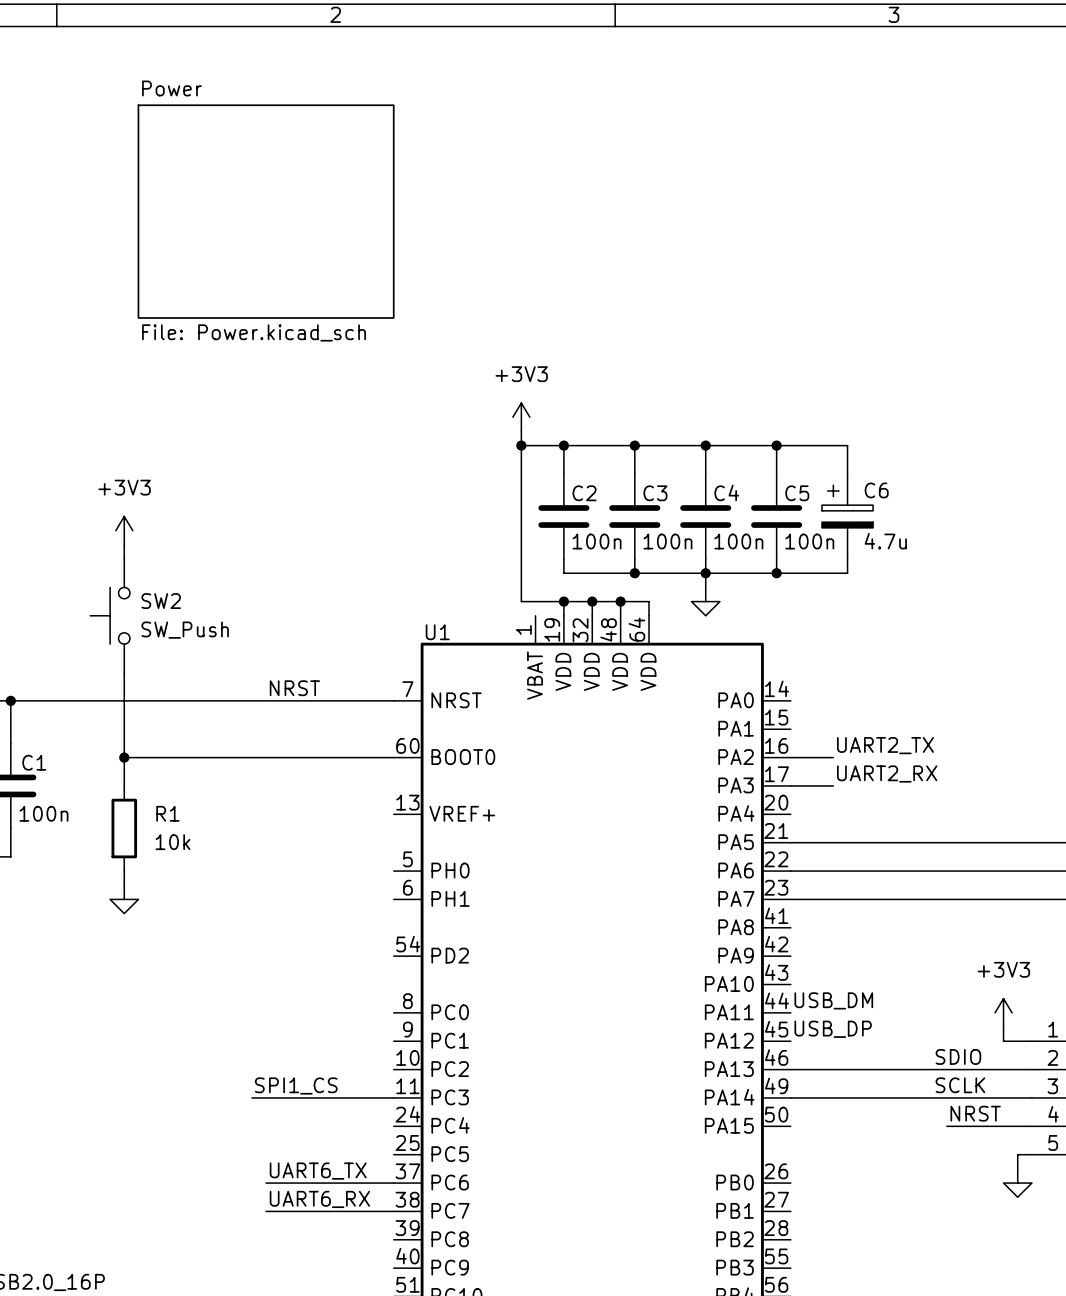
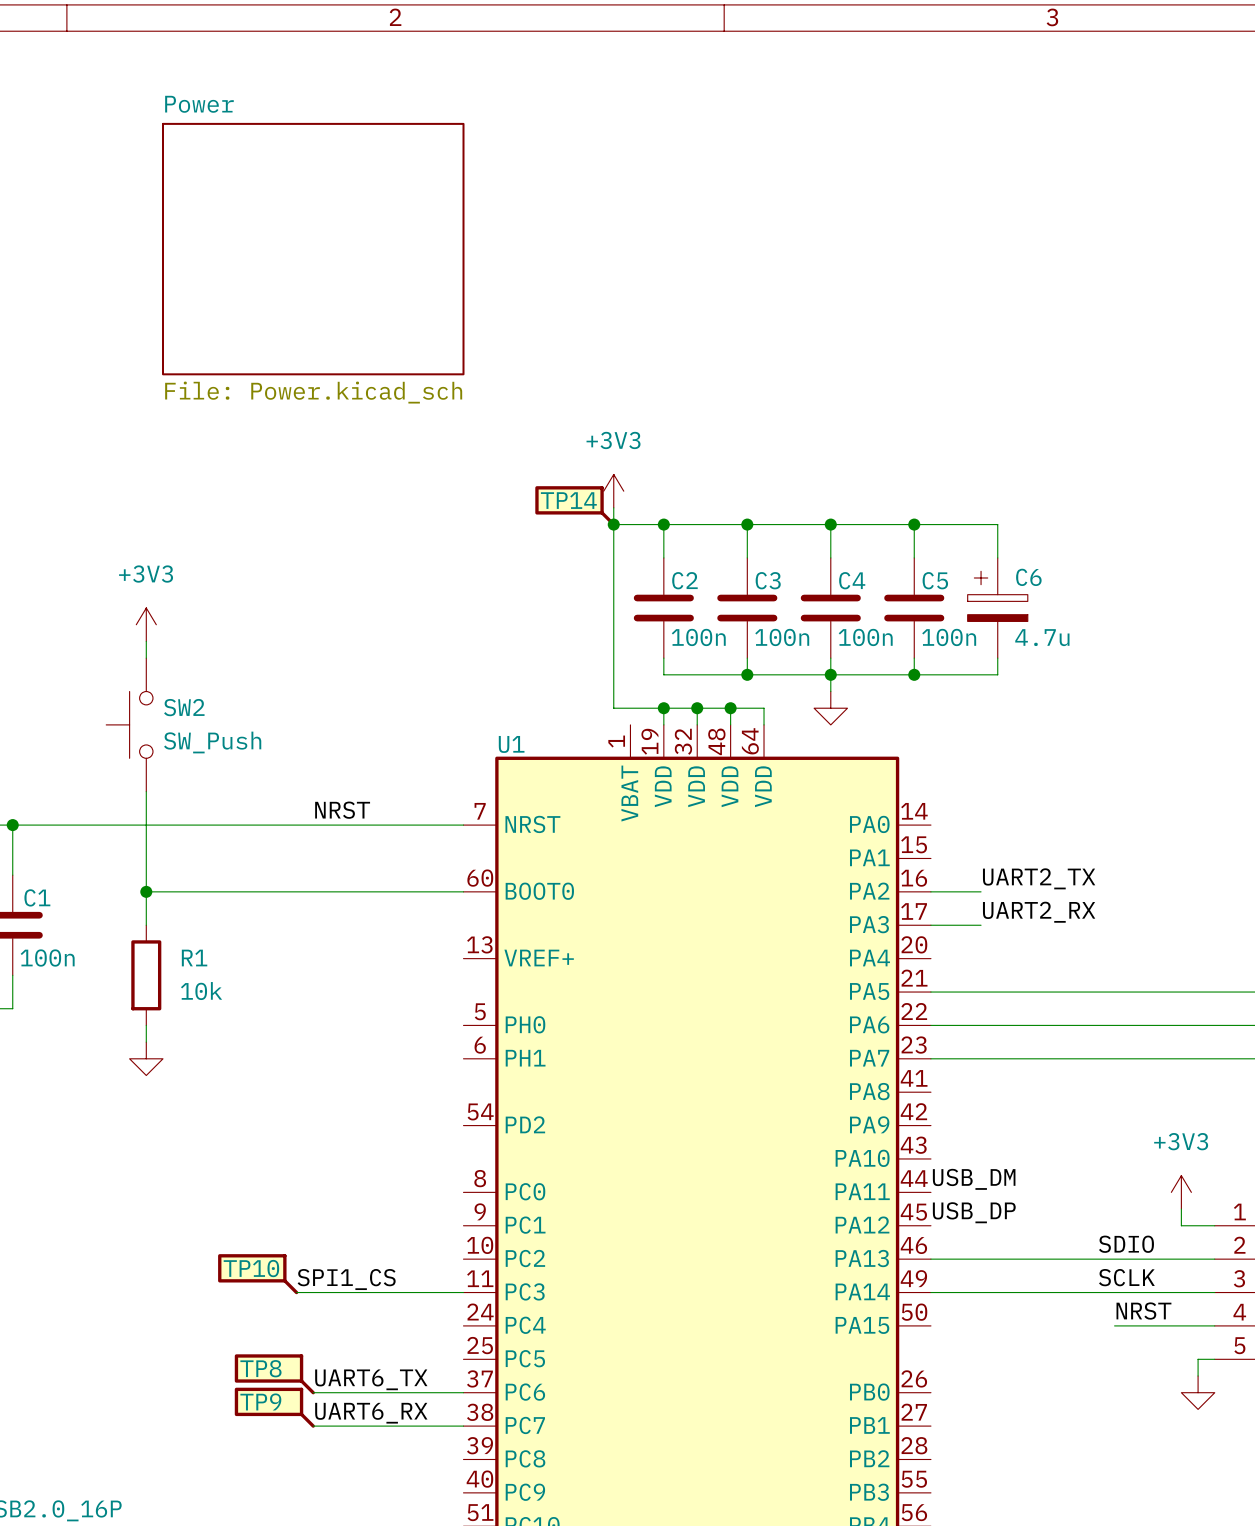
TP14: none -> (575, 506)
TP10: none -> (258, 1274)
TP8: none -> (274, 1374)
TP9: none -> (274, 1407)

